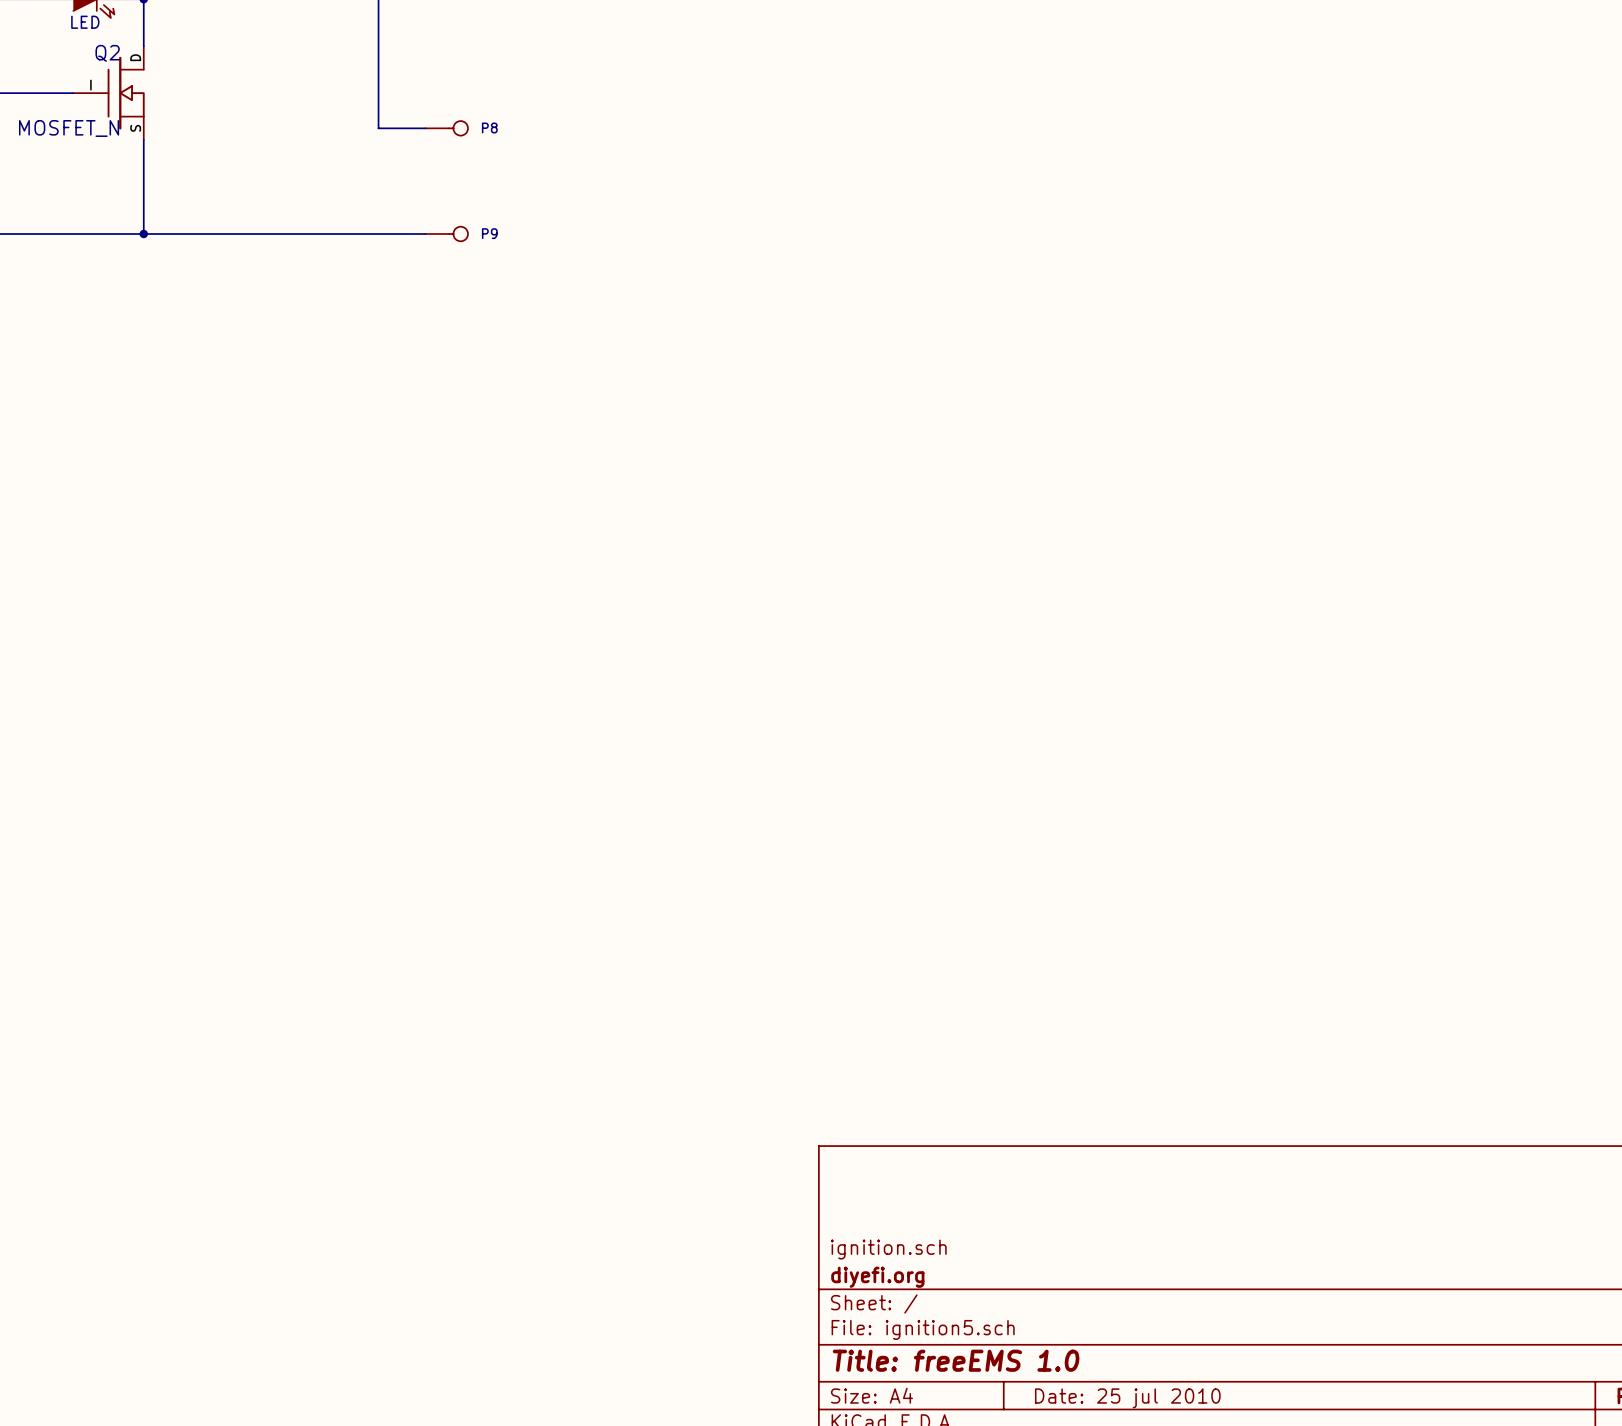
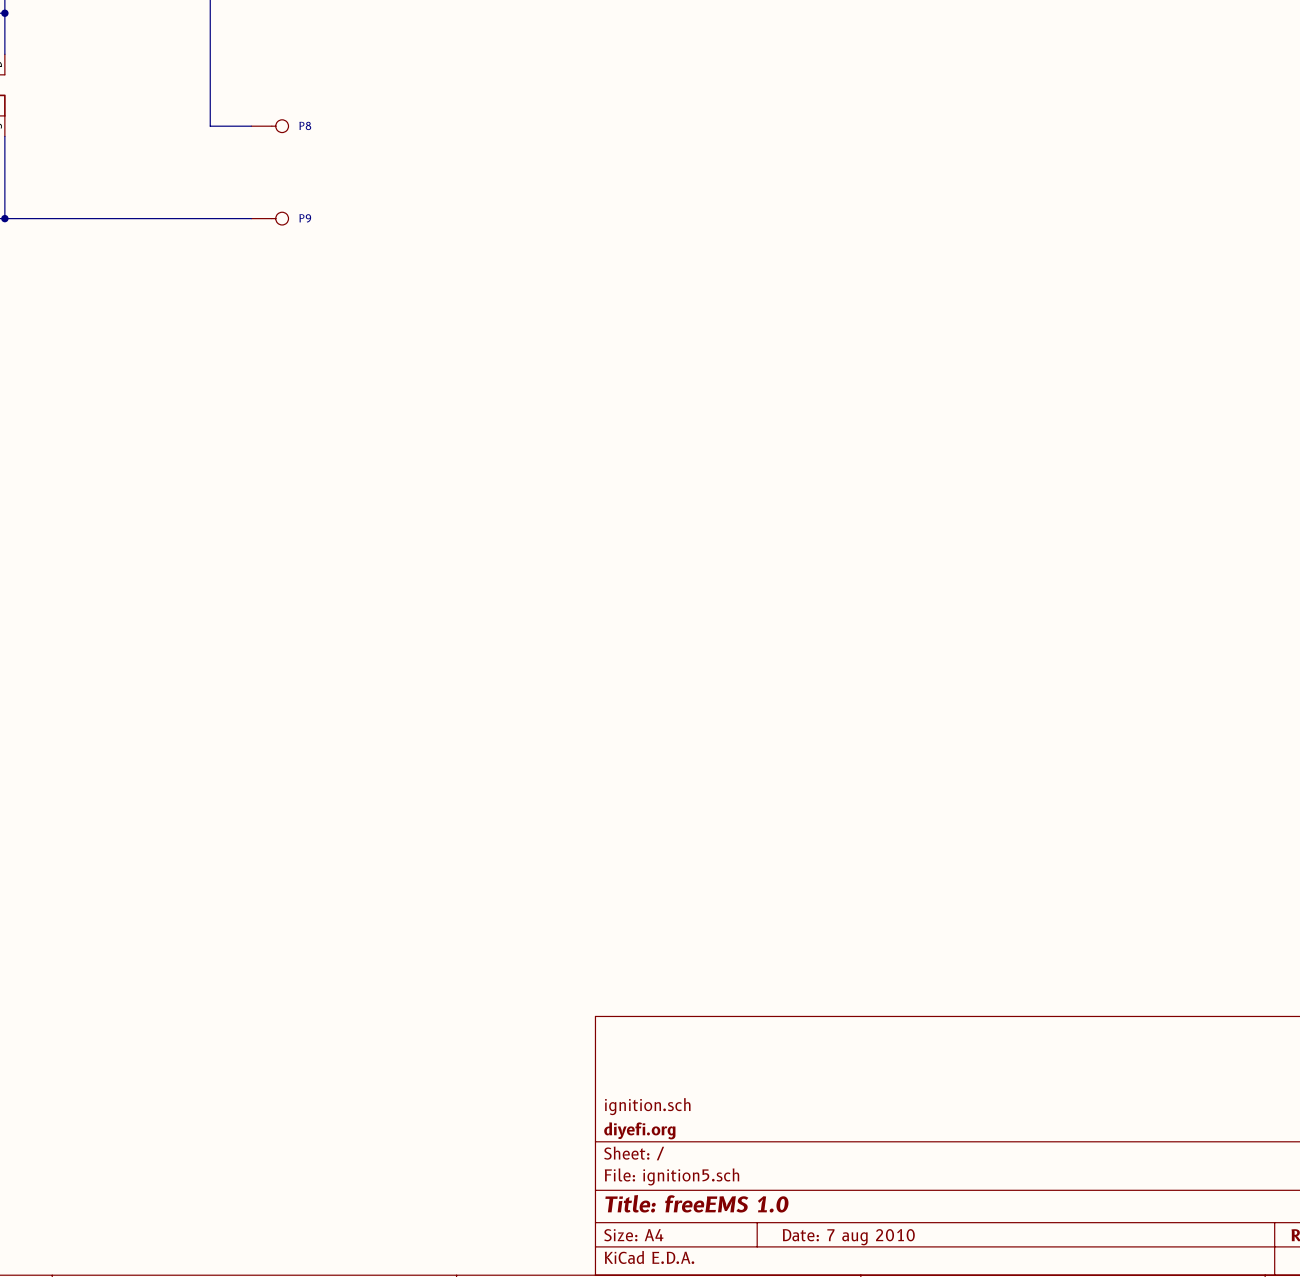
title block: Date: 25 jul 2010 (1127, 1398) -> Date: 7 aug 2010 (848, 1237)

